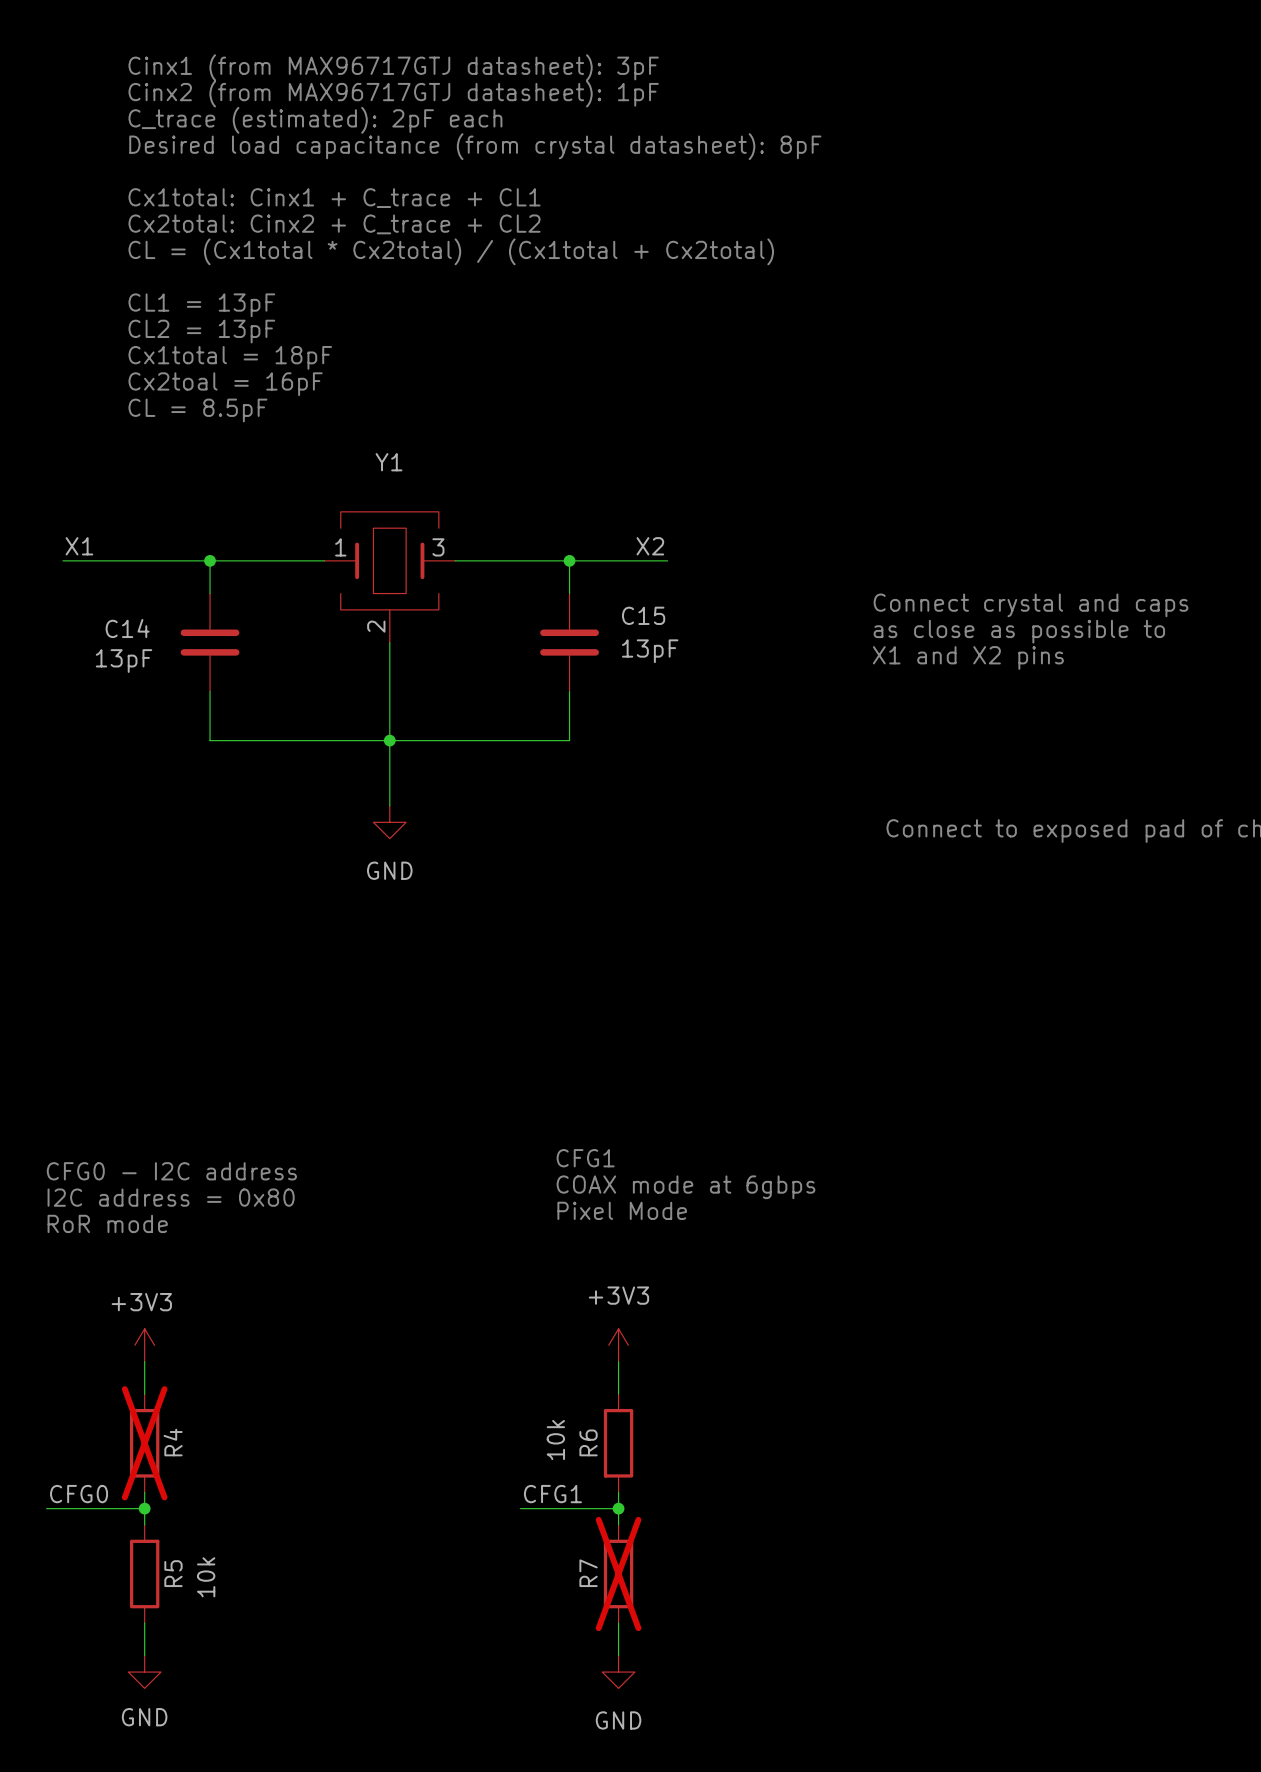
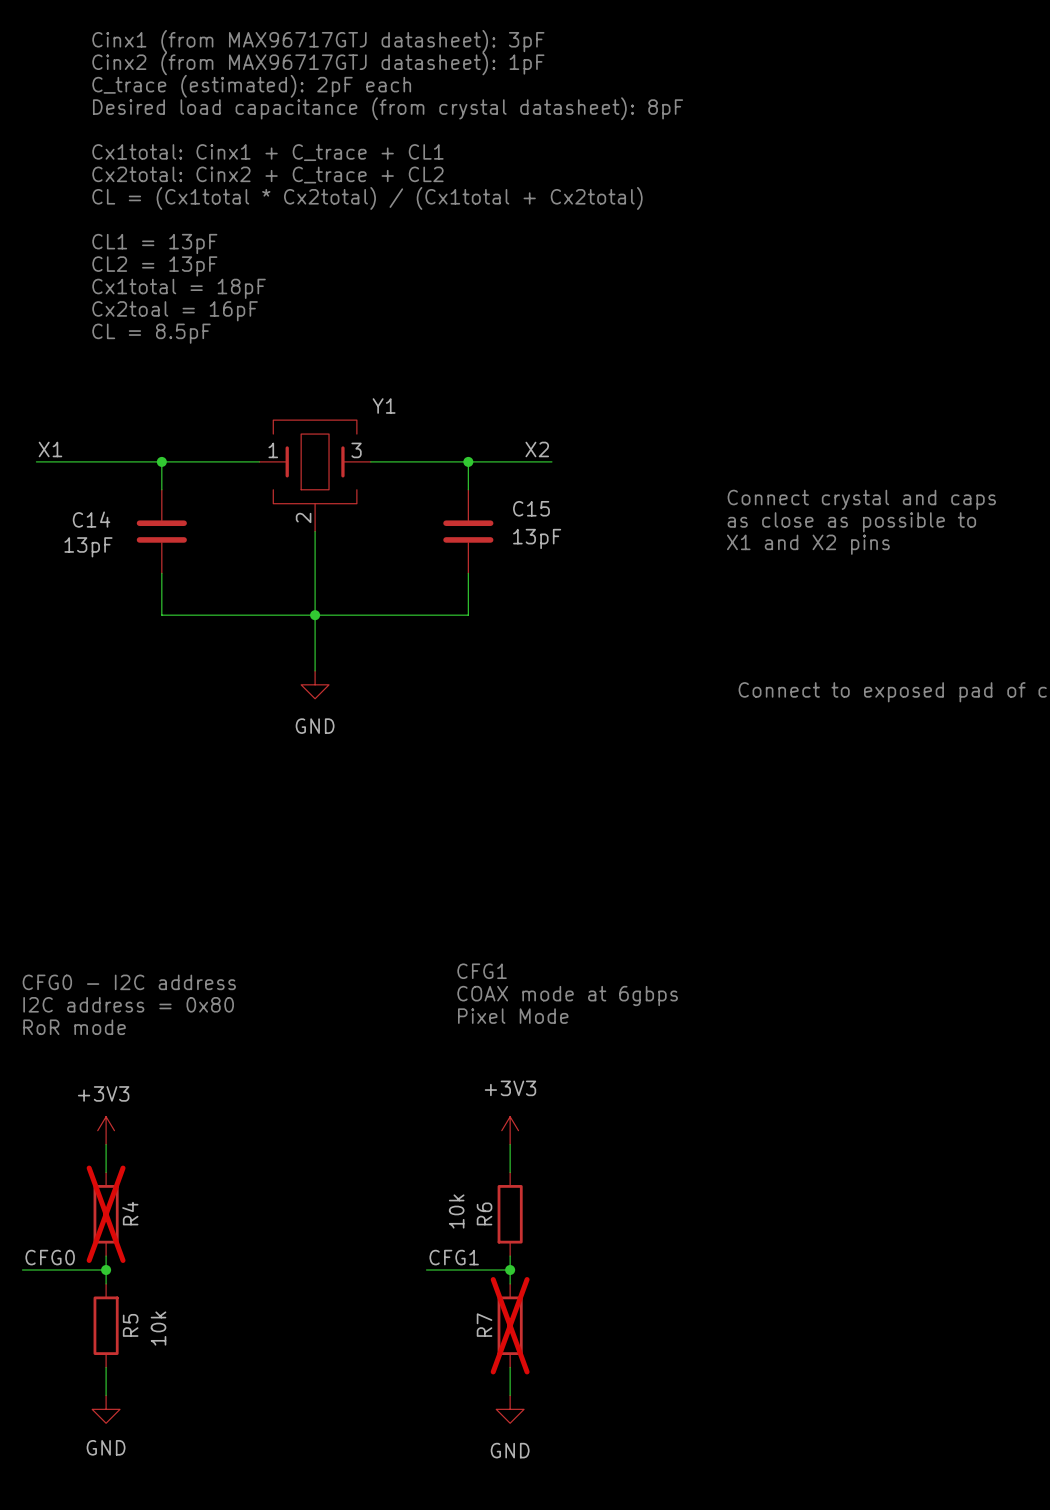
Y1 name position: Y1 (389, 462) -> Y1 (384, 406)

